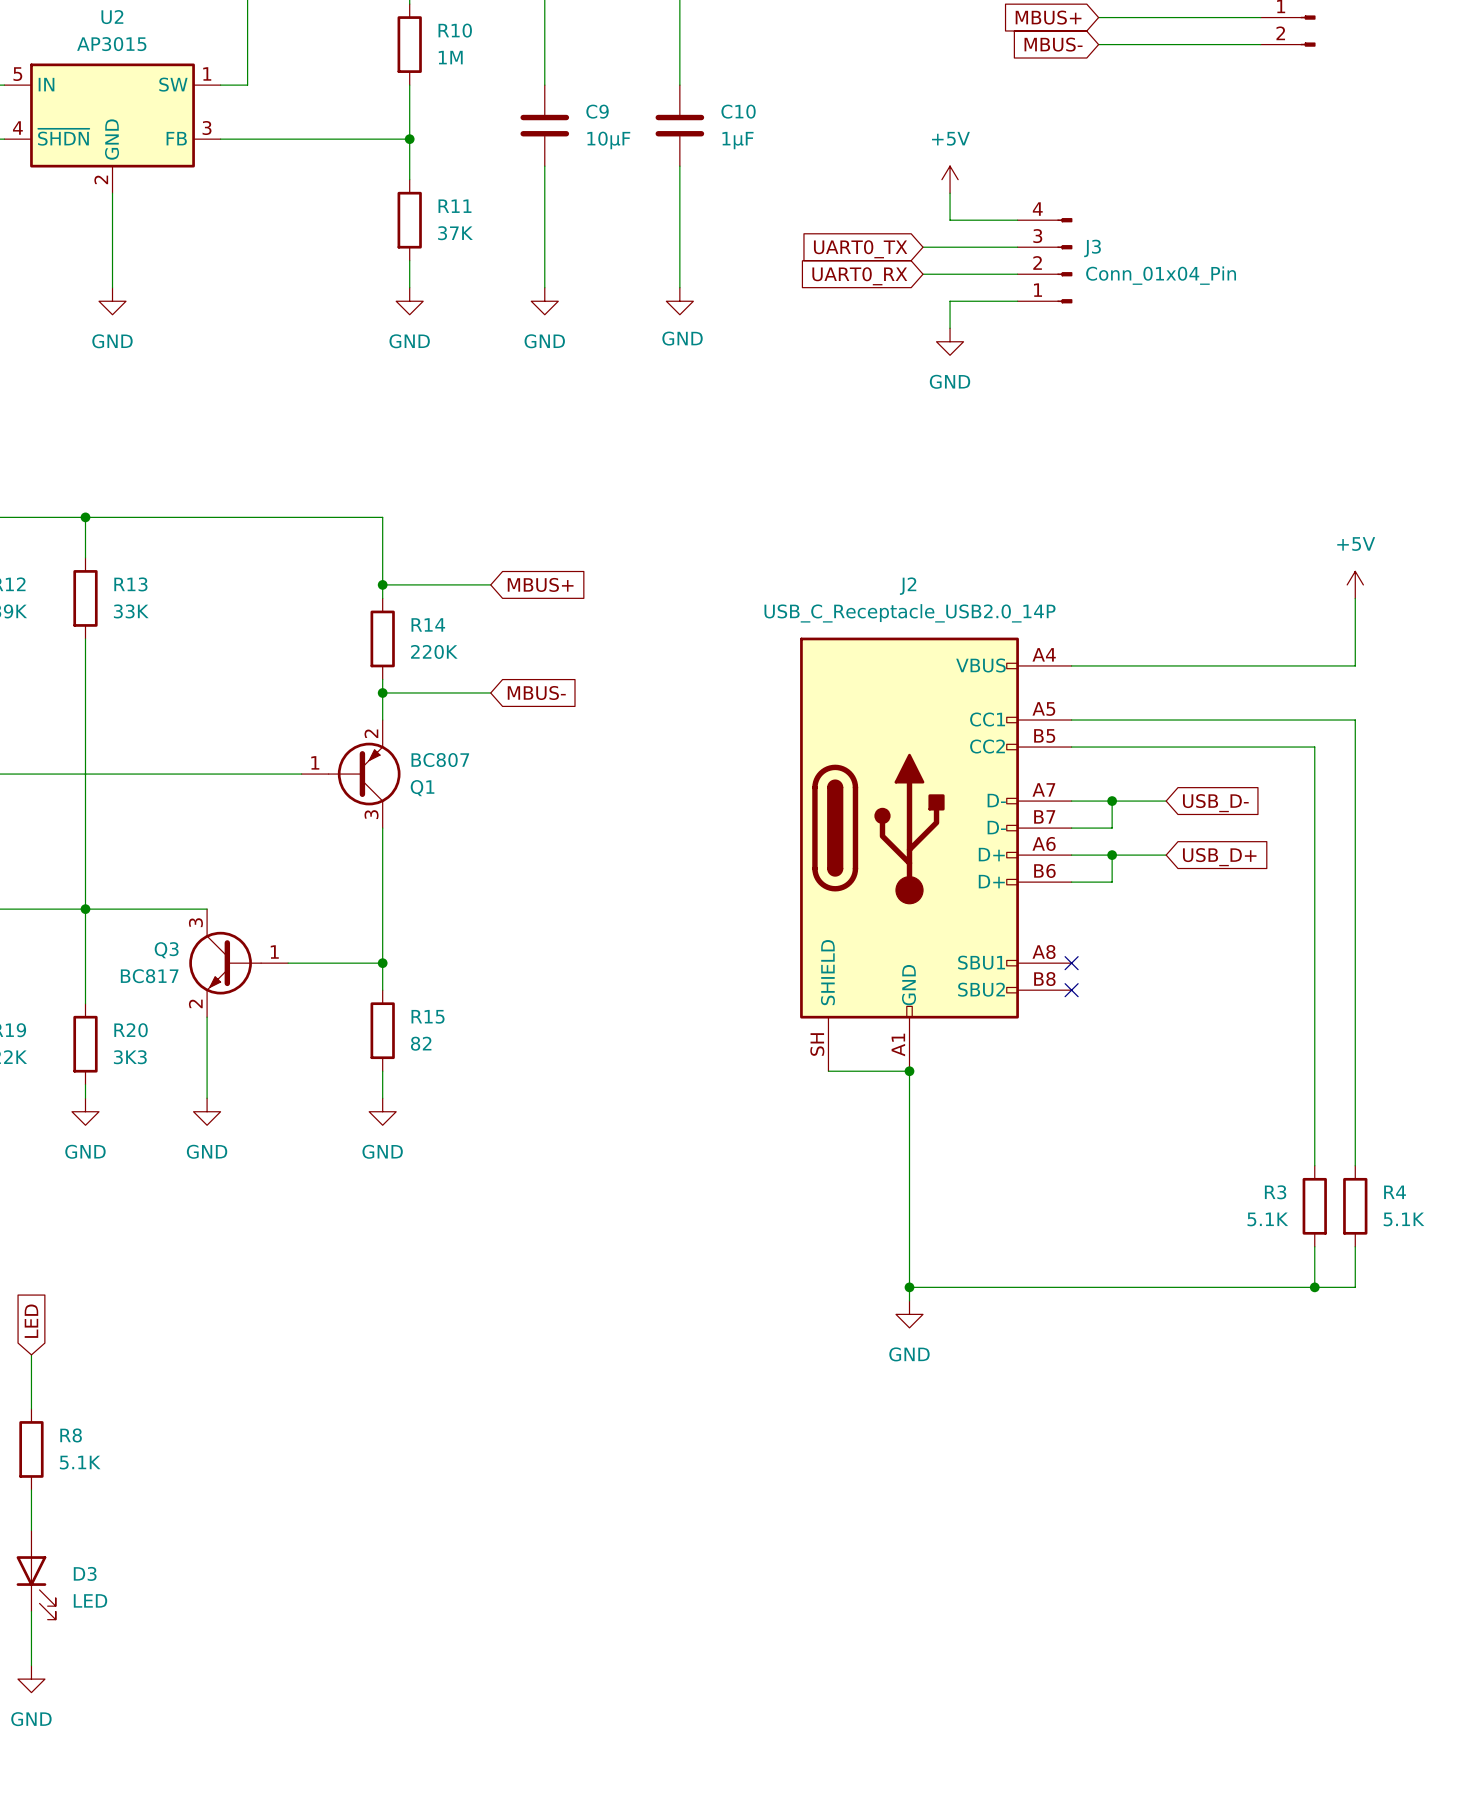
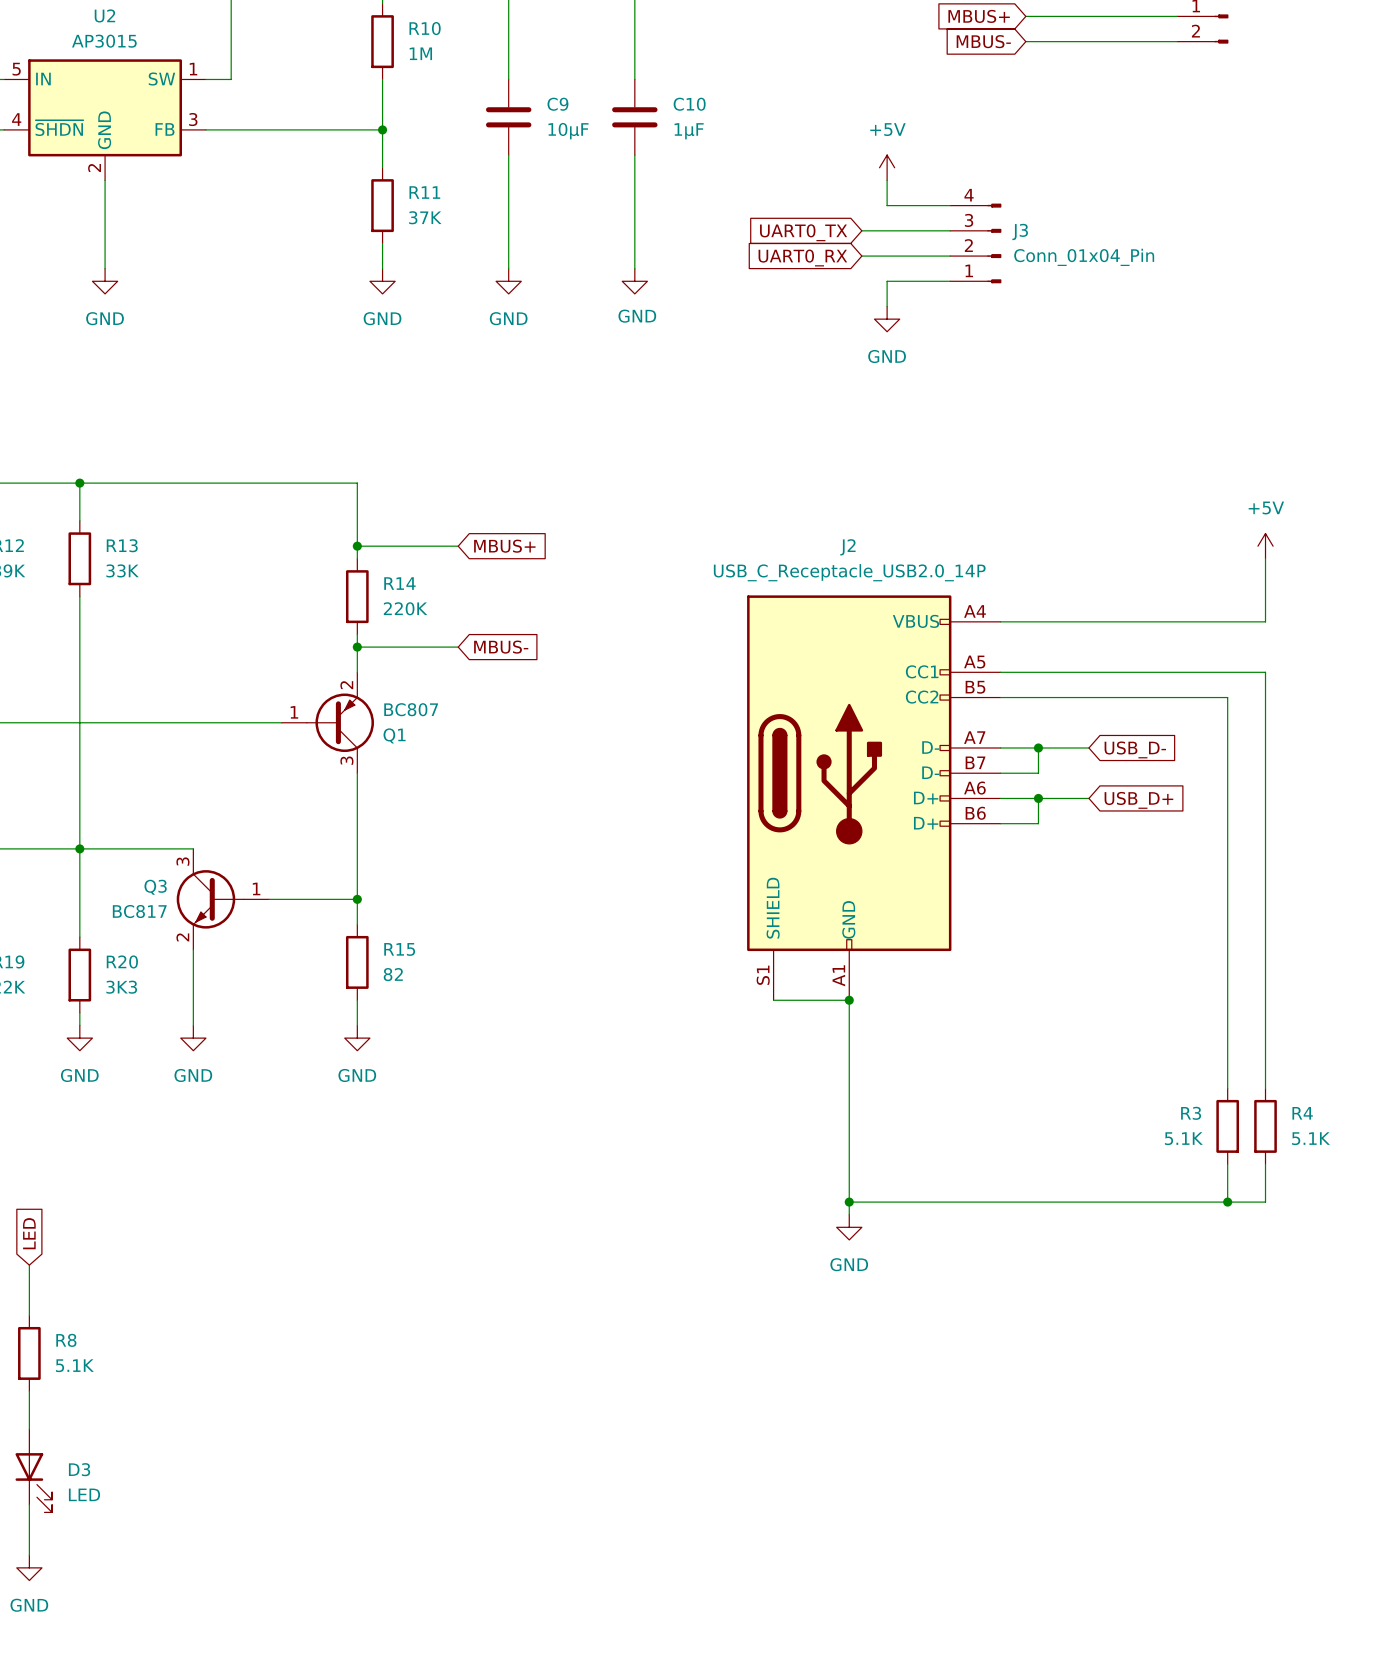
J2 symbol: [800, 637, 1072, 1072] -> [747, 595, 1001, 1001]
no-connect mark: (1071, 963) -> none
no-connect mark: (1071, 990) -> none

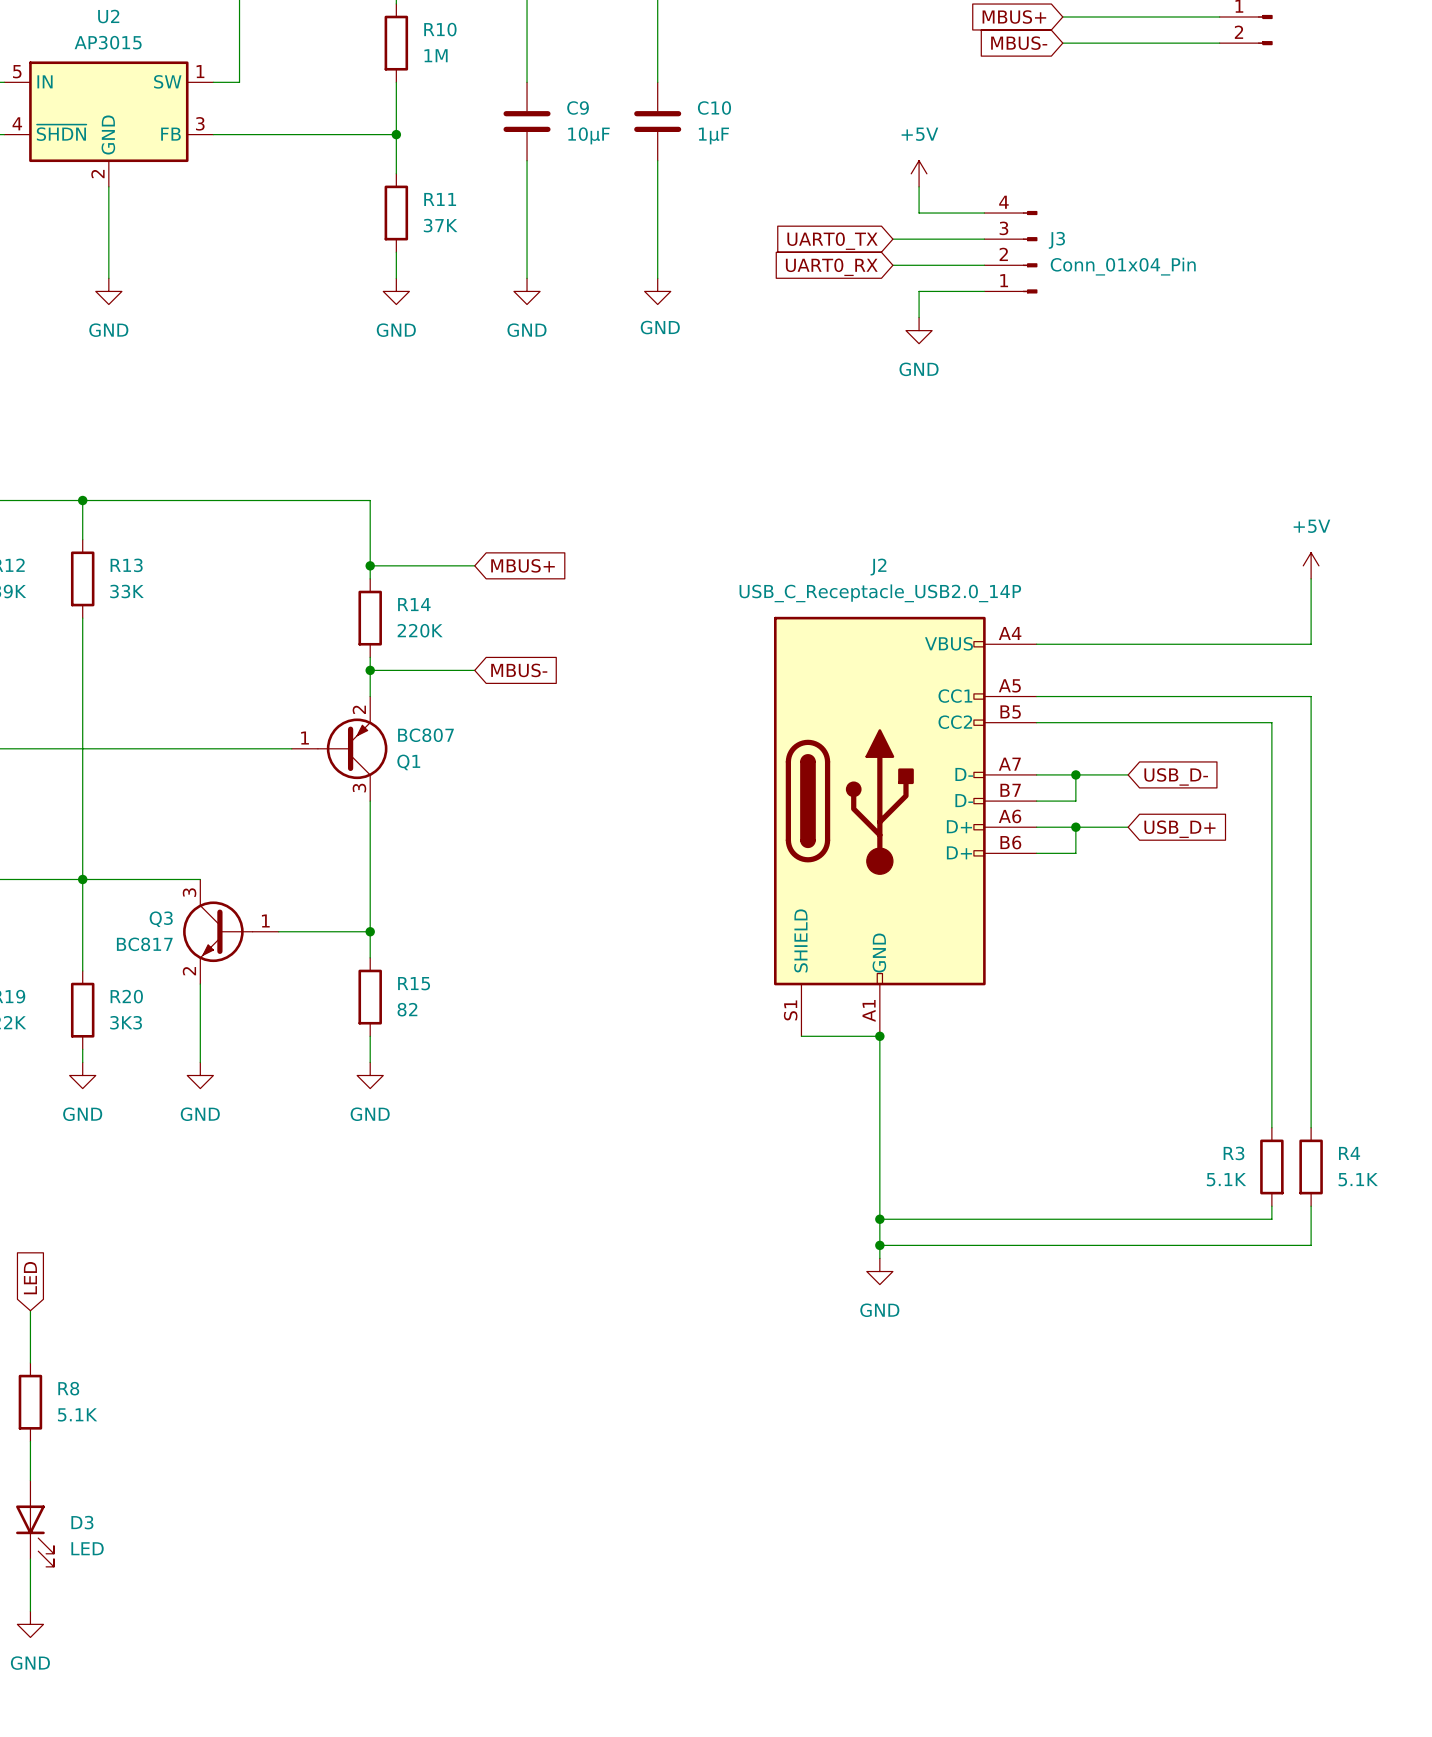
junction: none -> (879, 1219)
wire: (1227, 1176) (1227, 1202) -> (1271, 1219) (879, 1219)
junction: (1227, 1202) -> none

